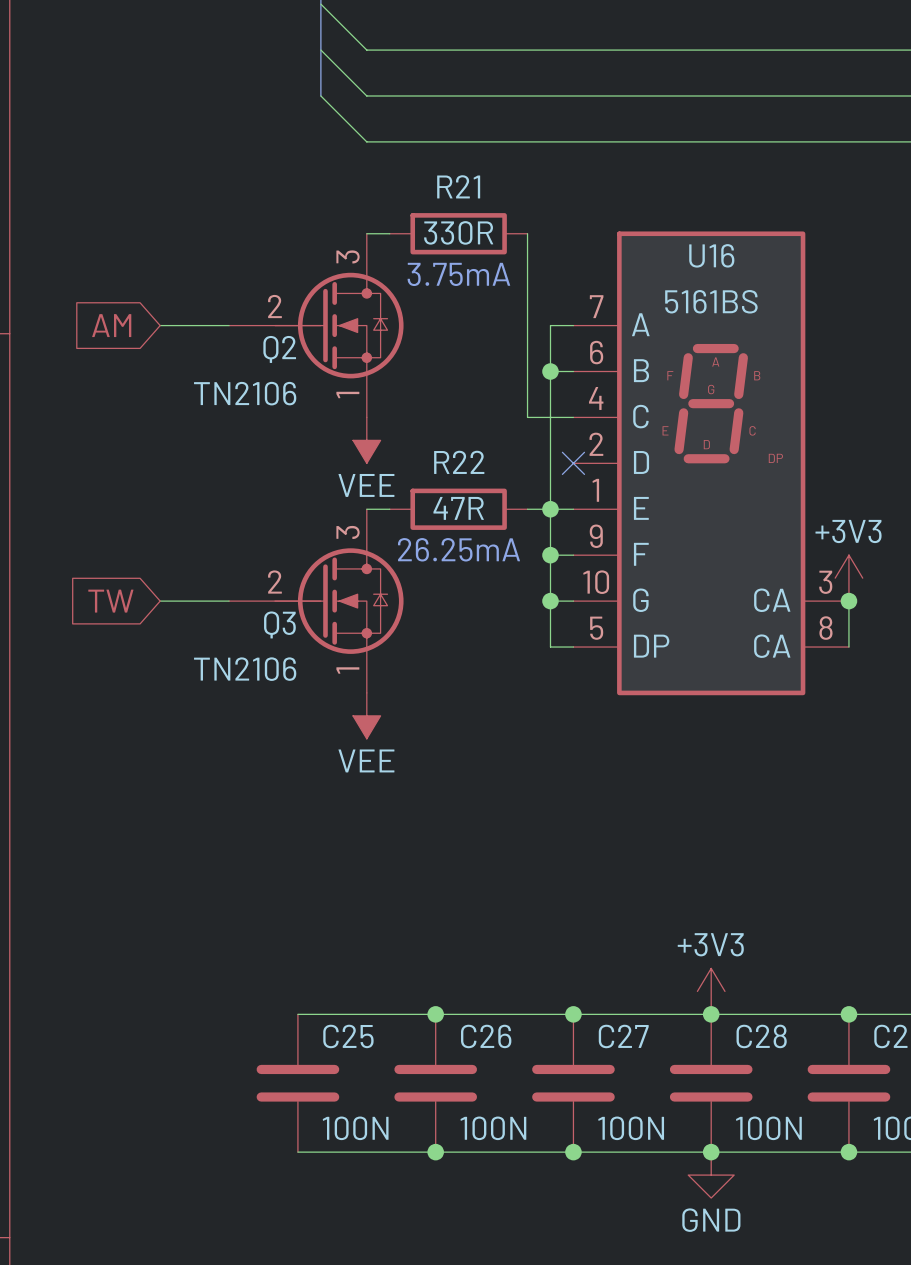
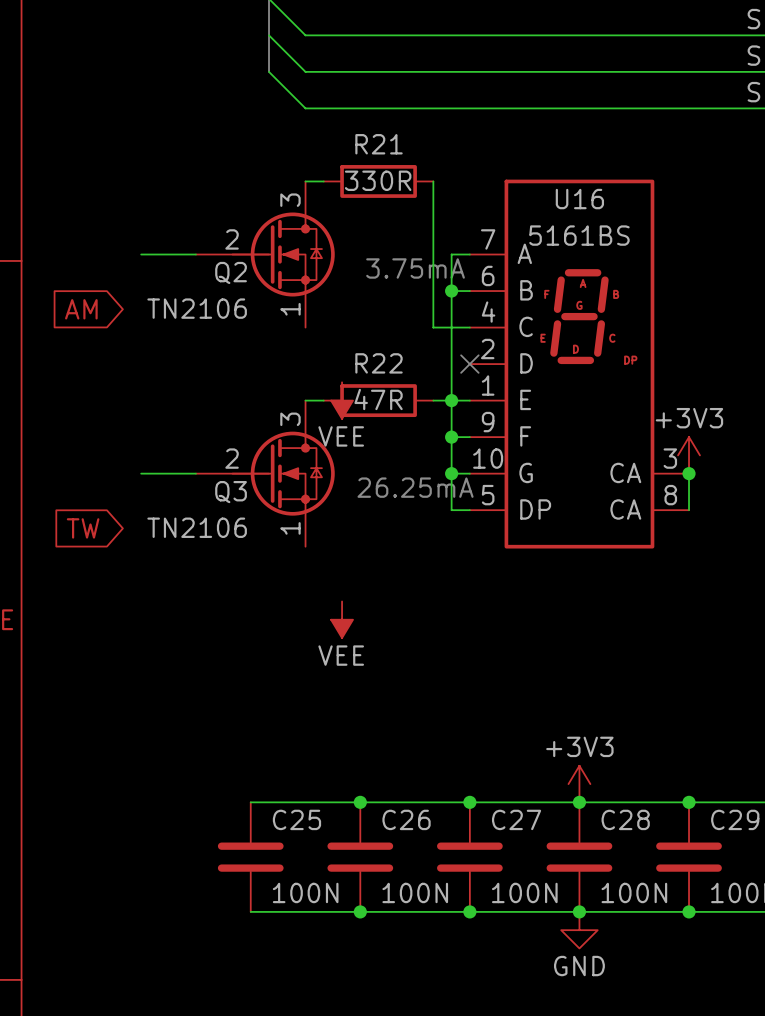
text position: 3.75mA (458, 274) -> 3.75mA (415, 268)
global label position: AM (111, 325) -> AM (81, 309)
power symbol position: VEE (366, 440) -> VEE (342, 400)
text position: 26.25mA (459, 549) -> 26.25mA (415, 487)
global label position: TW (110, 601) -> TW (83, 528)
power symbol position: VEE (366, 715) -> VEE (342, 619)

